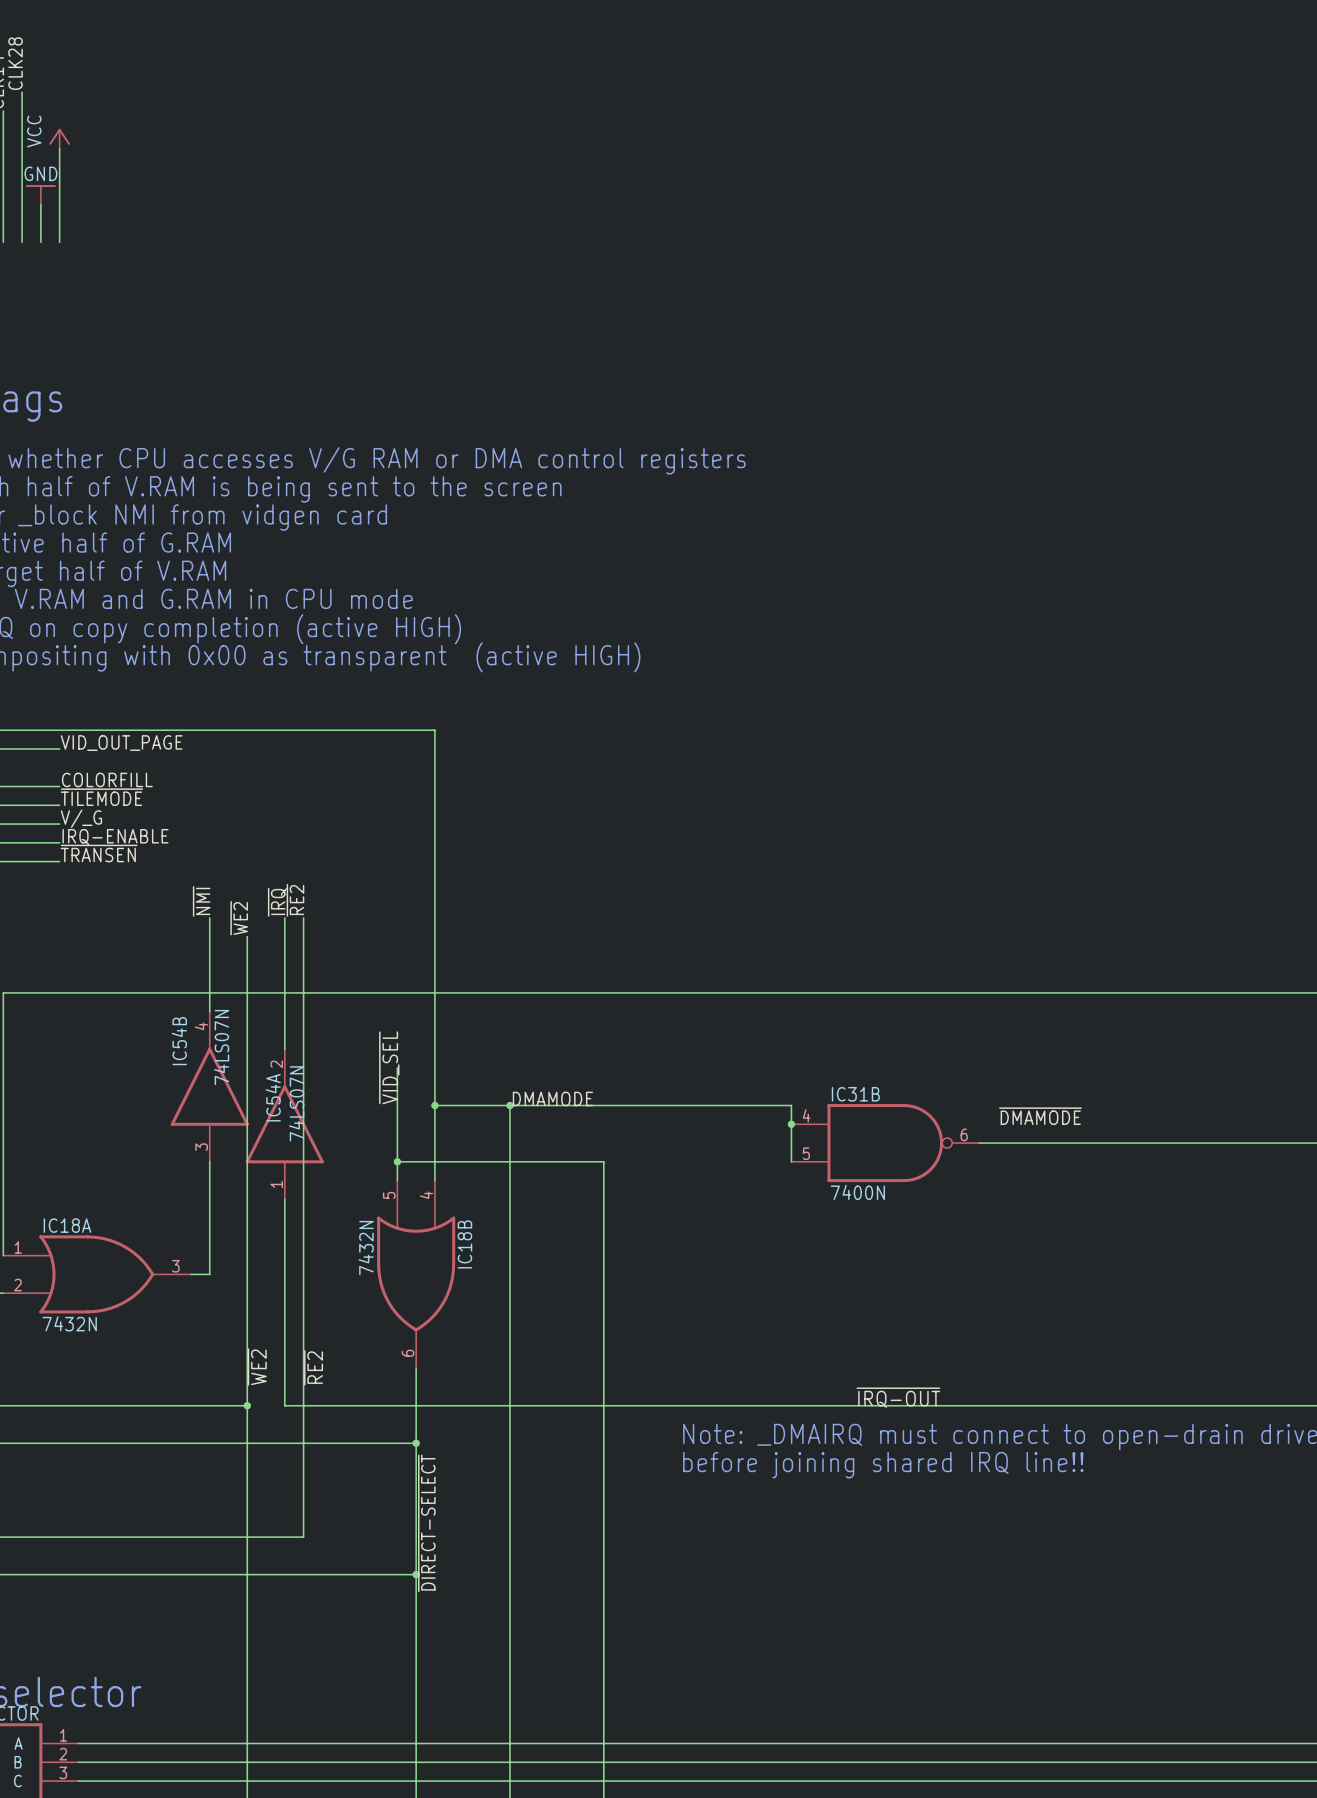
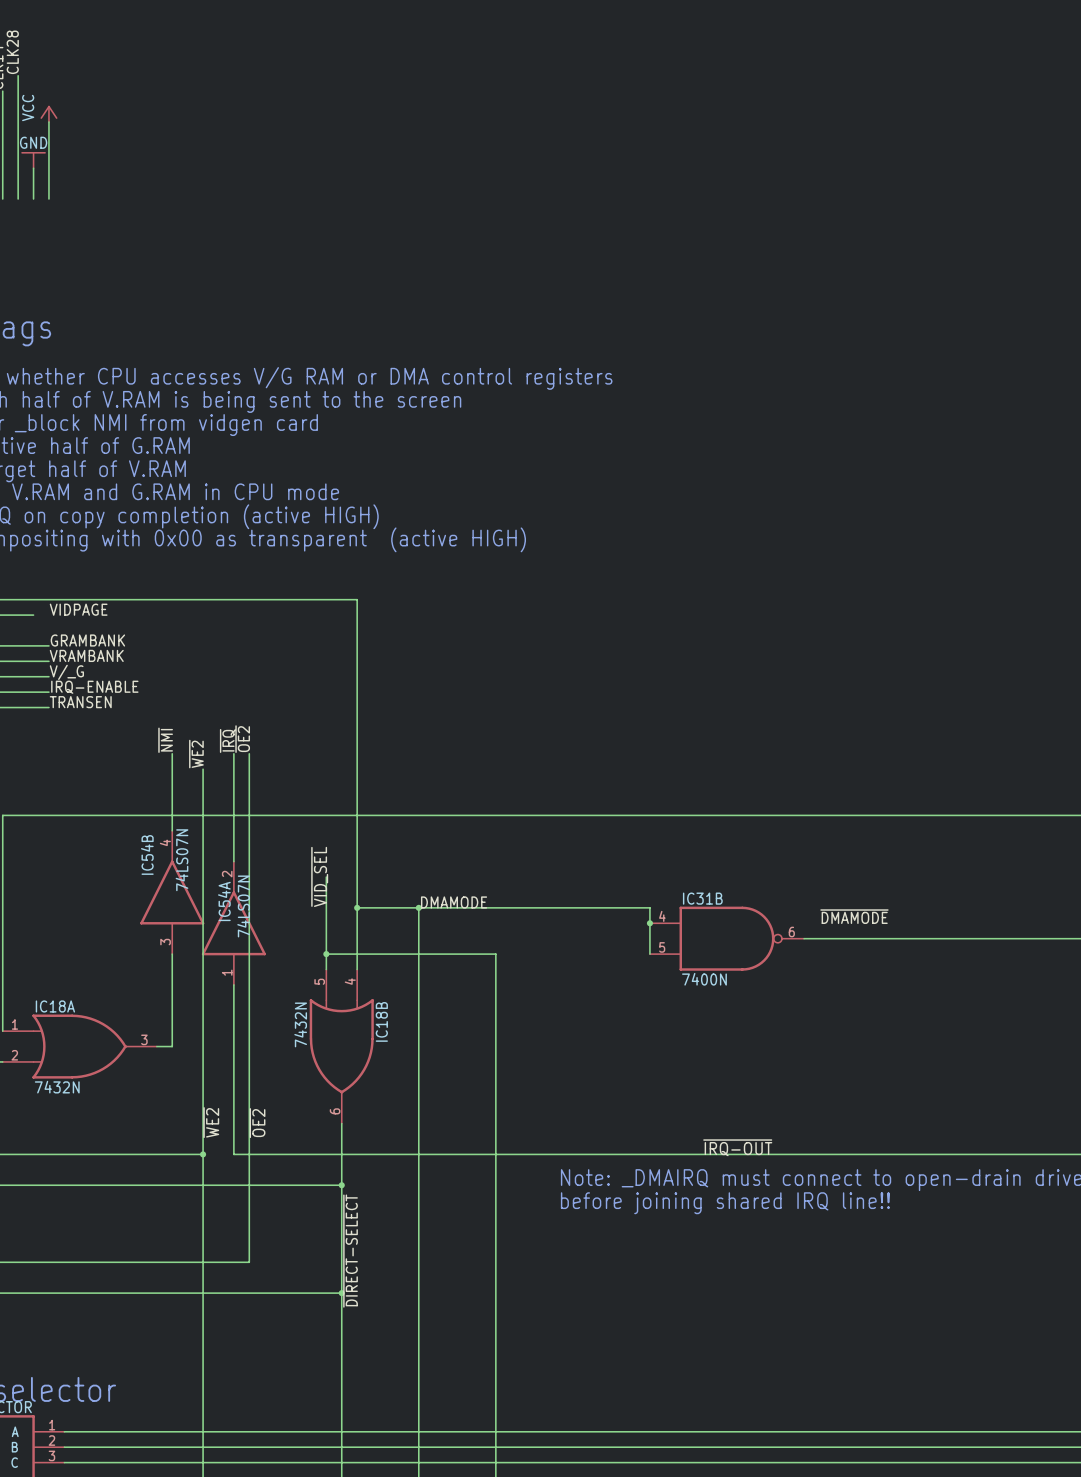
label: VID_OUT_PAGE (121, 743) -> VIDPAGE (78, 609)
wire: (40, 749) (59, 749) -> none
label: COLORFILL (107, 779) -> GRAMBANK (87, 640)
label: ~{TILEMODE} (101, 797) -> VRAMBANK (86, 655)
label: ~{TRANSEN} (99, 853) -> TRANSEN (80, 702)
label: ~{RE2} (295, 900) -> ~{OE2} (242, 739)
label: ~{RE2} (313, 1367) -> ~{OE2} (257, 1123)

